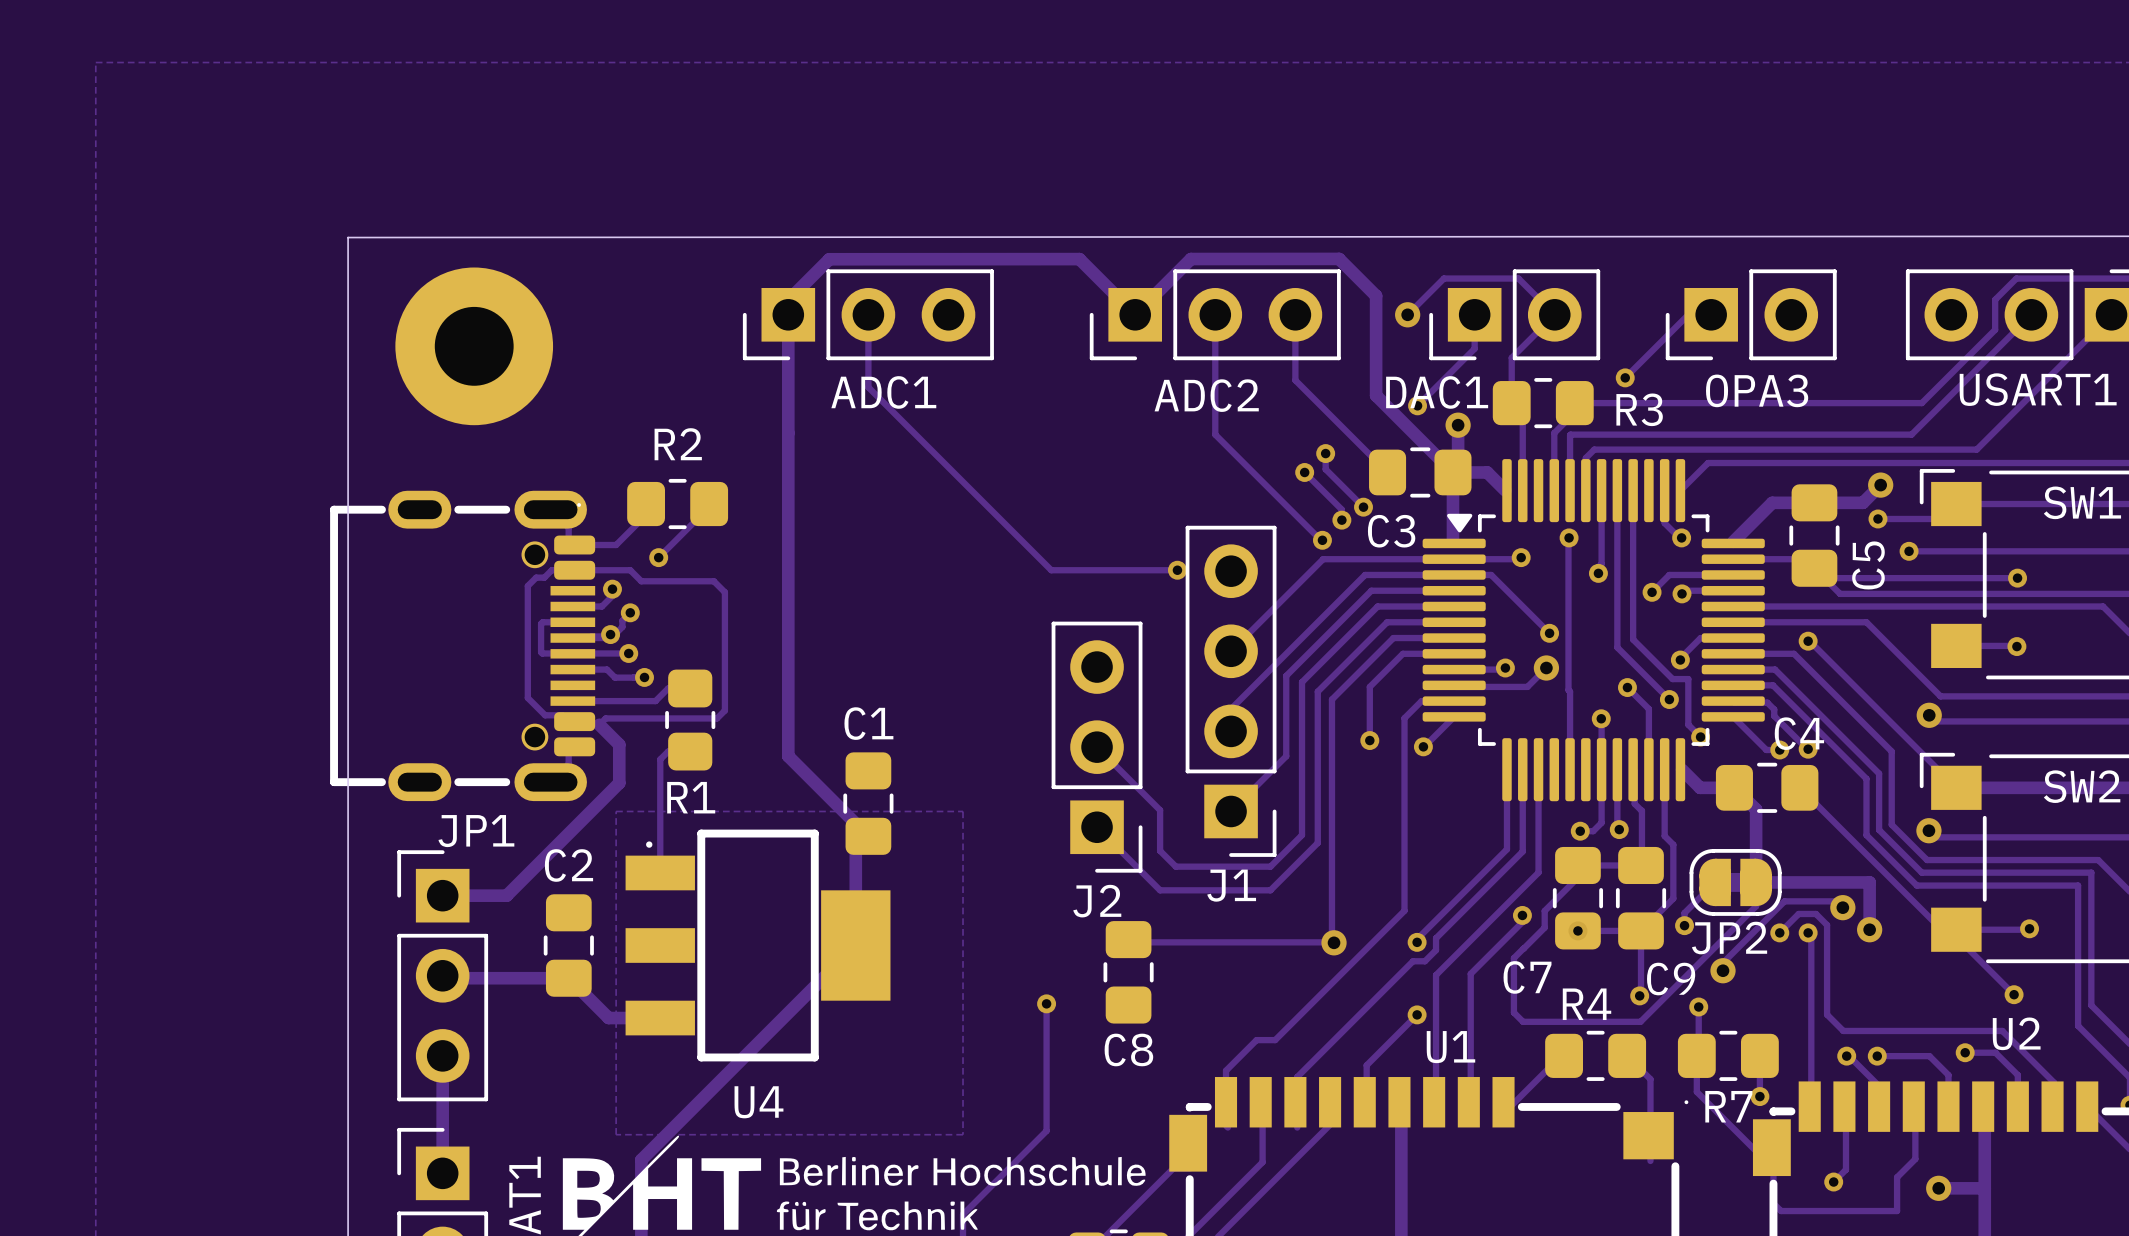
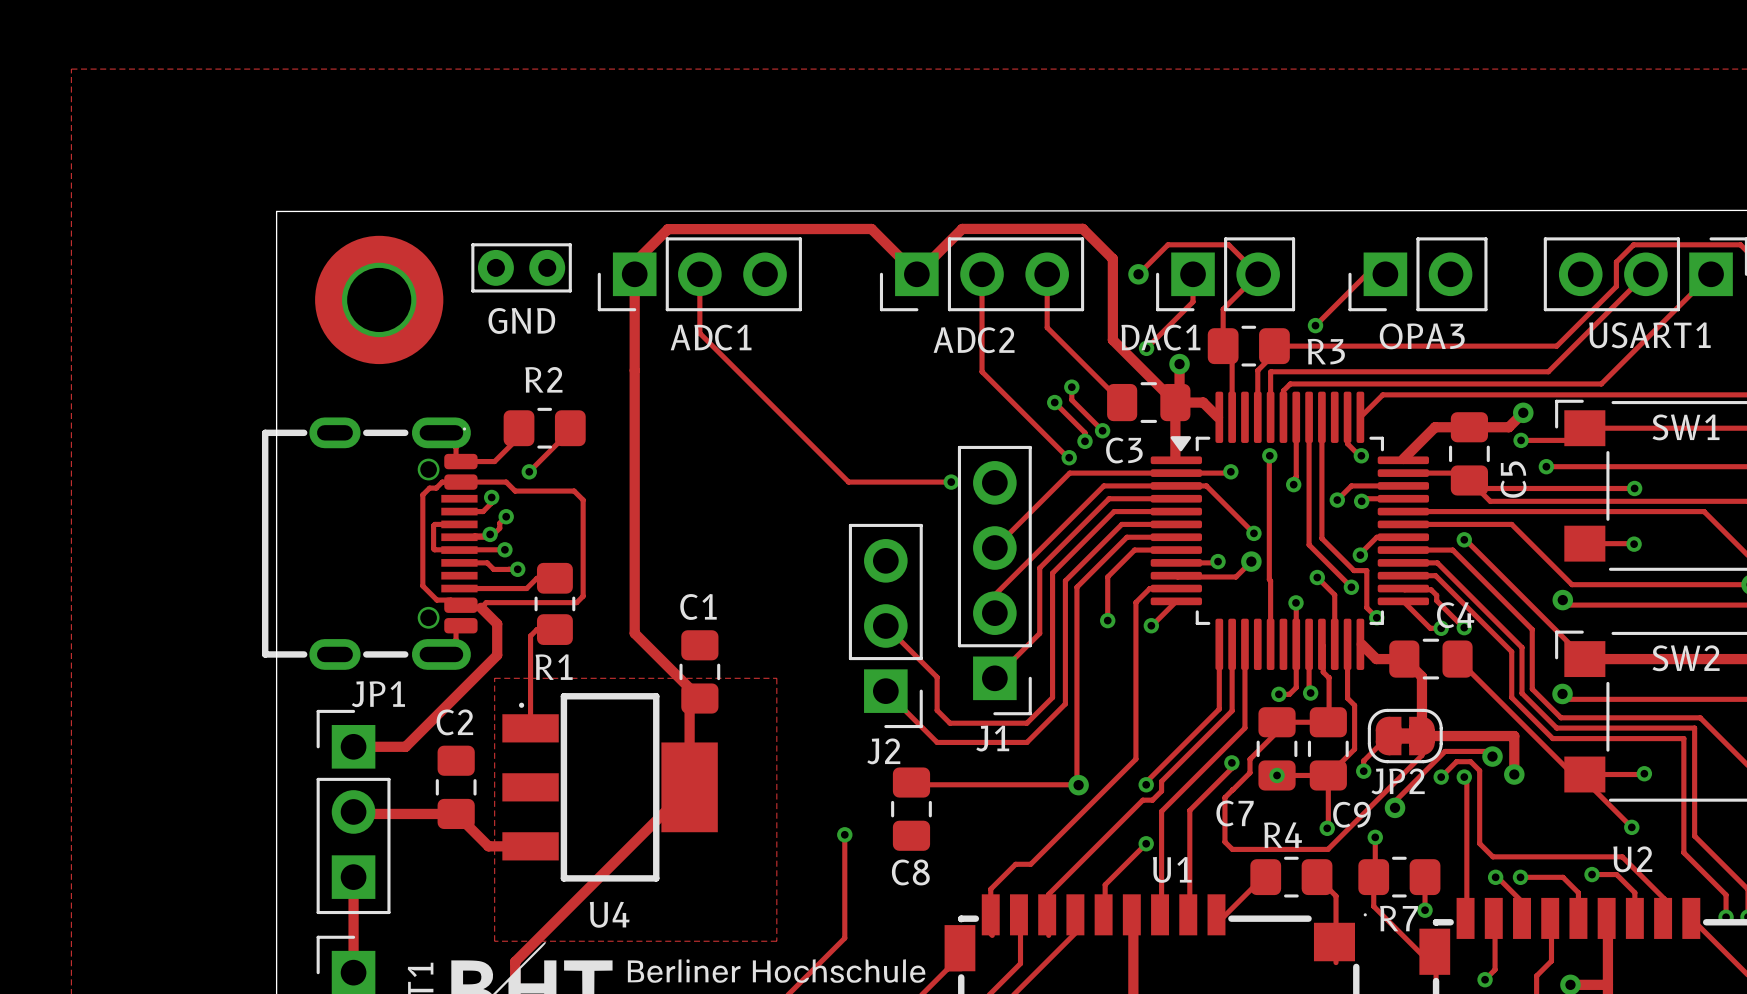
GND: none -> (521, 267)
JP1 footprint: [397, 850, 489, 1102] -> [316, 709, 391, 915]

